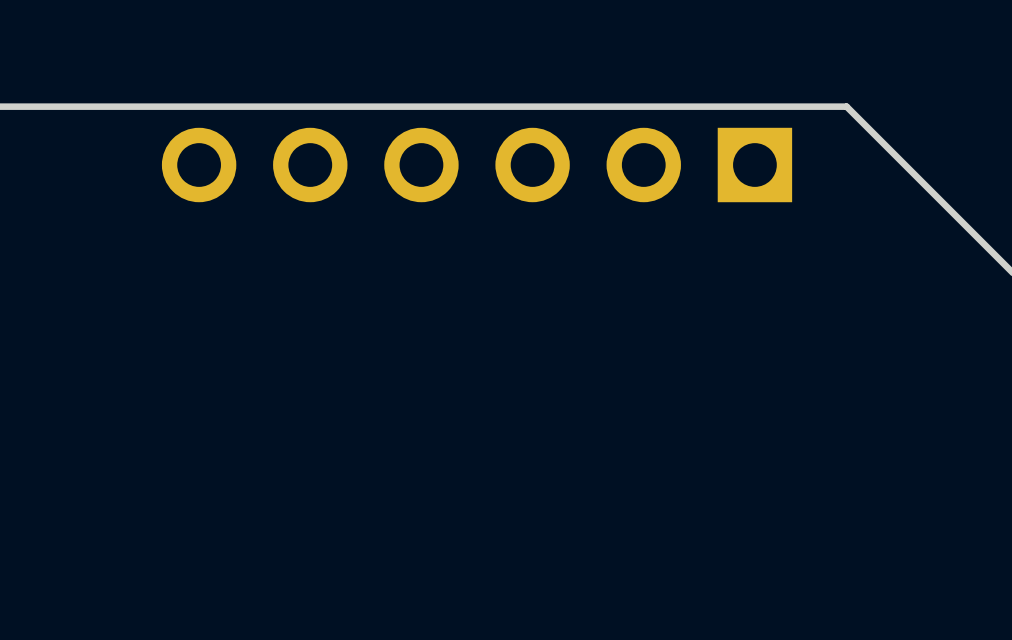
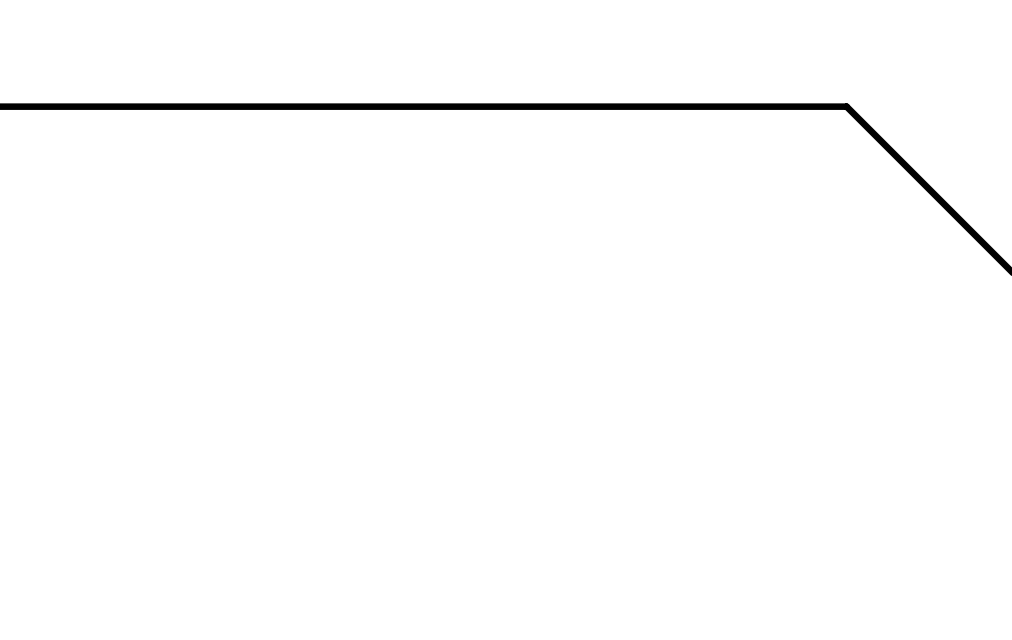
part: (477, 165) -> none

